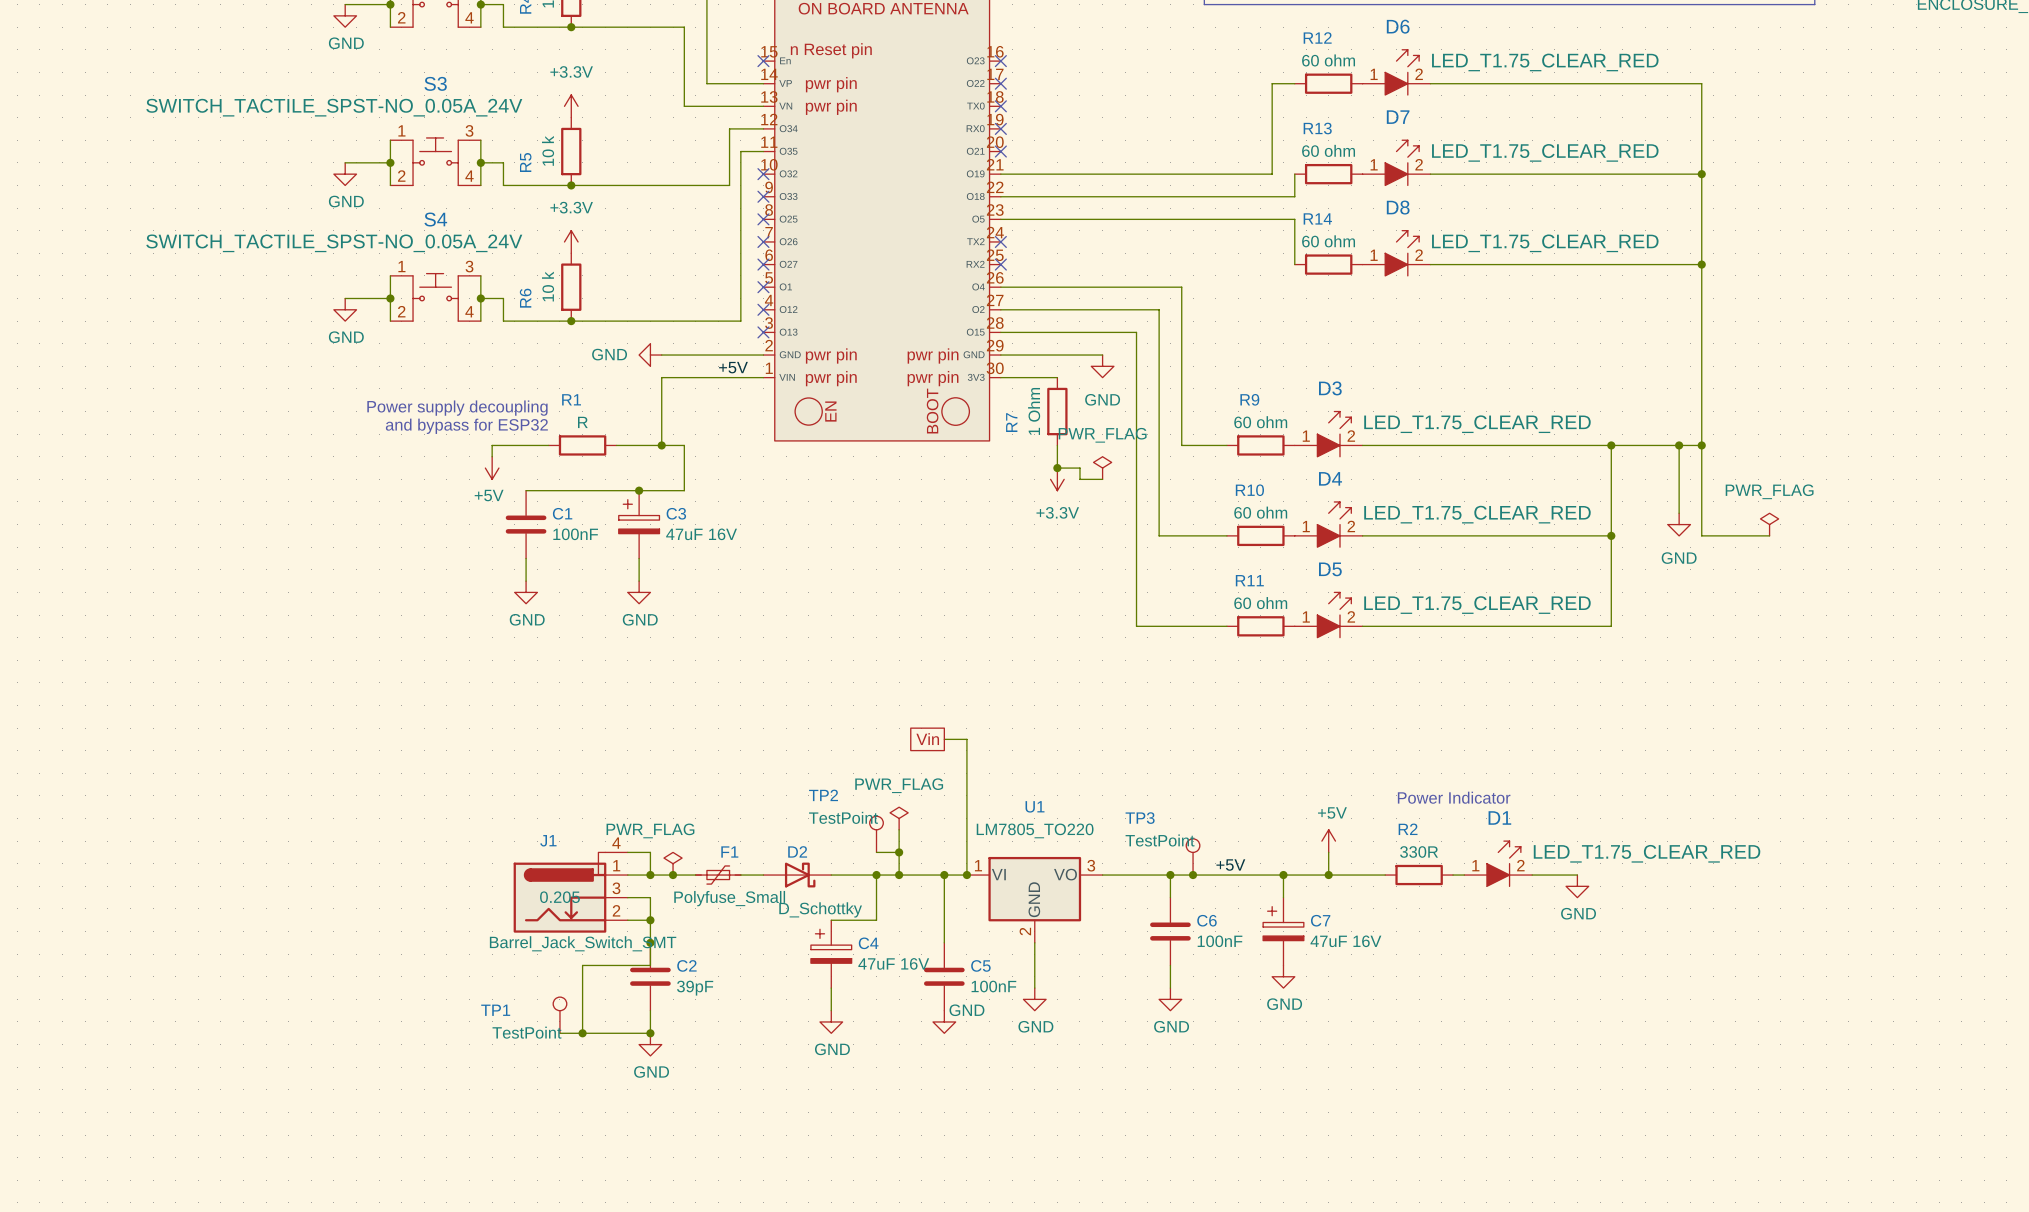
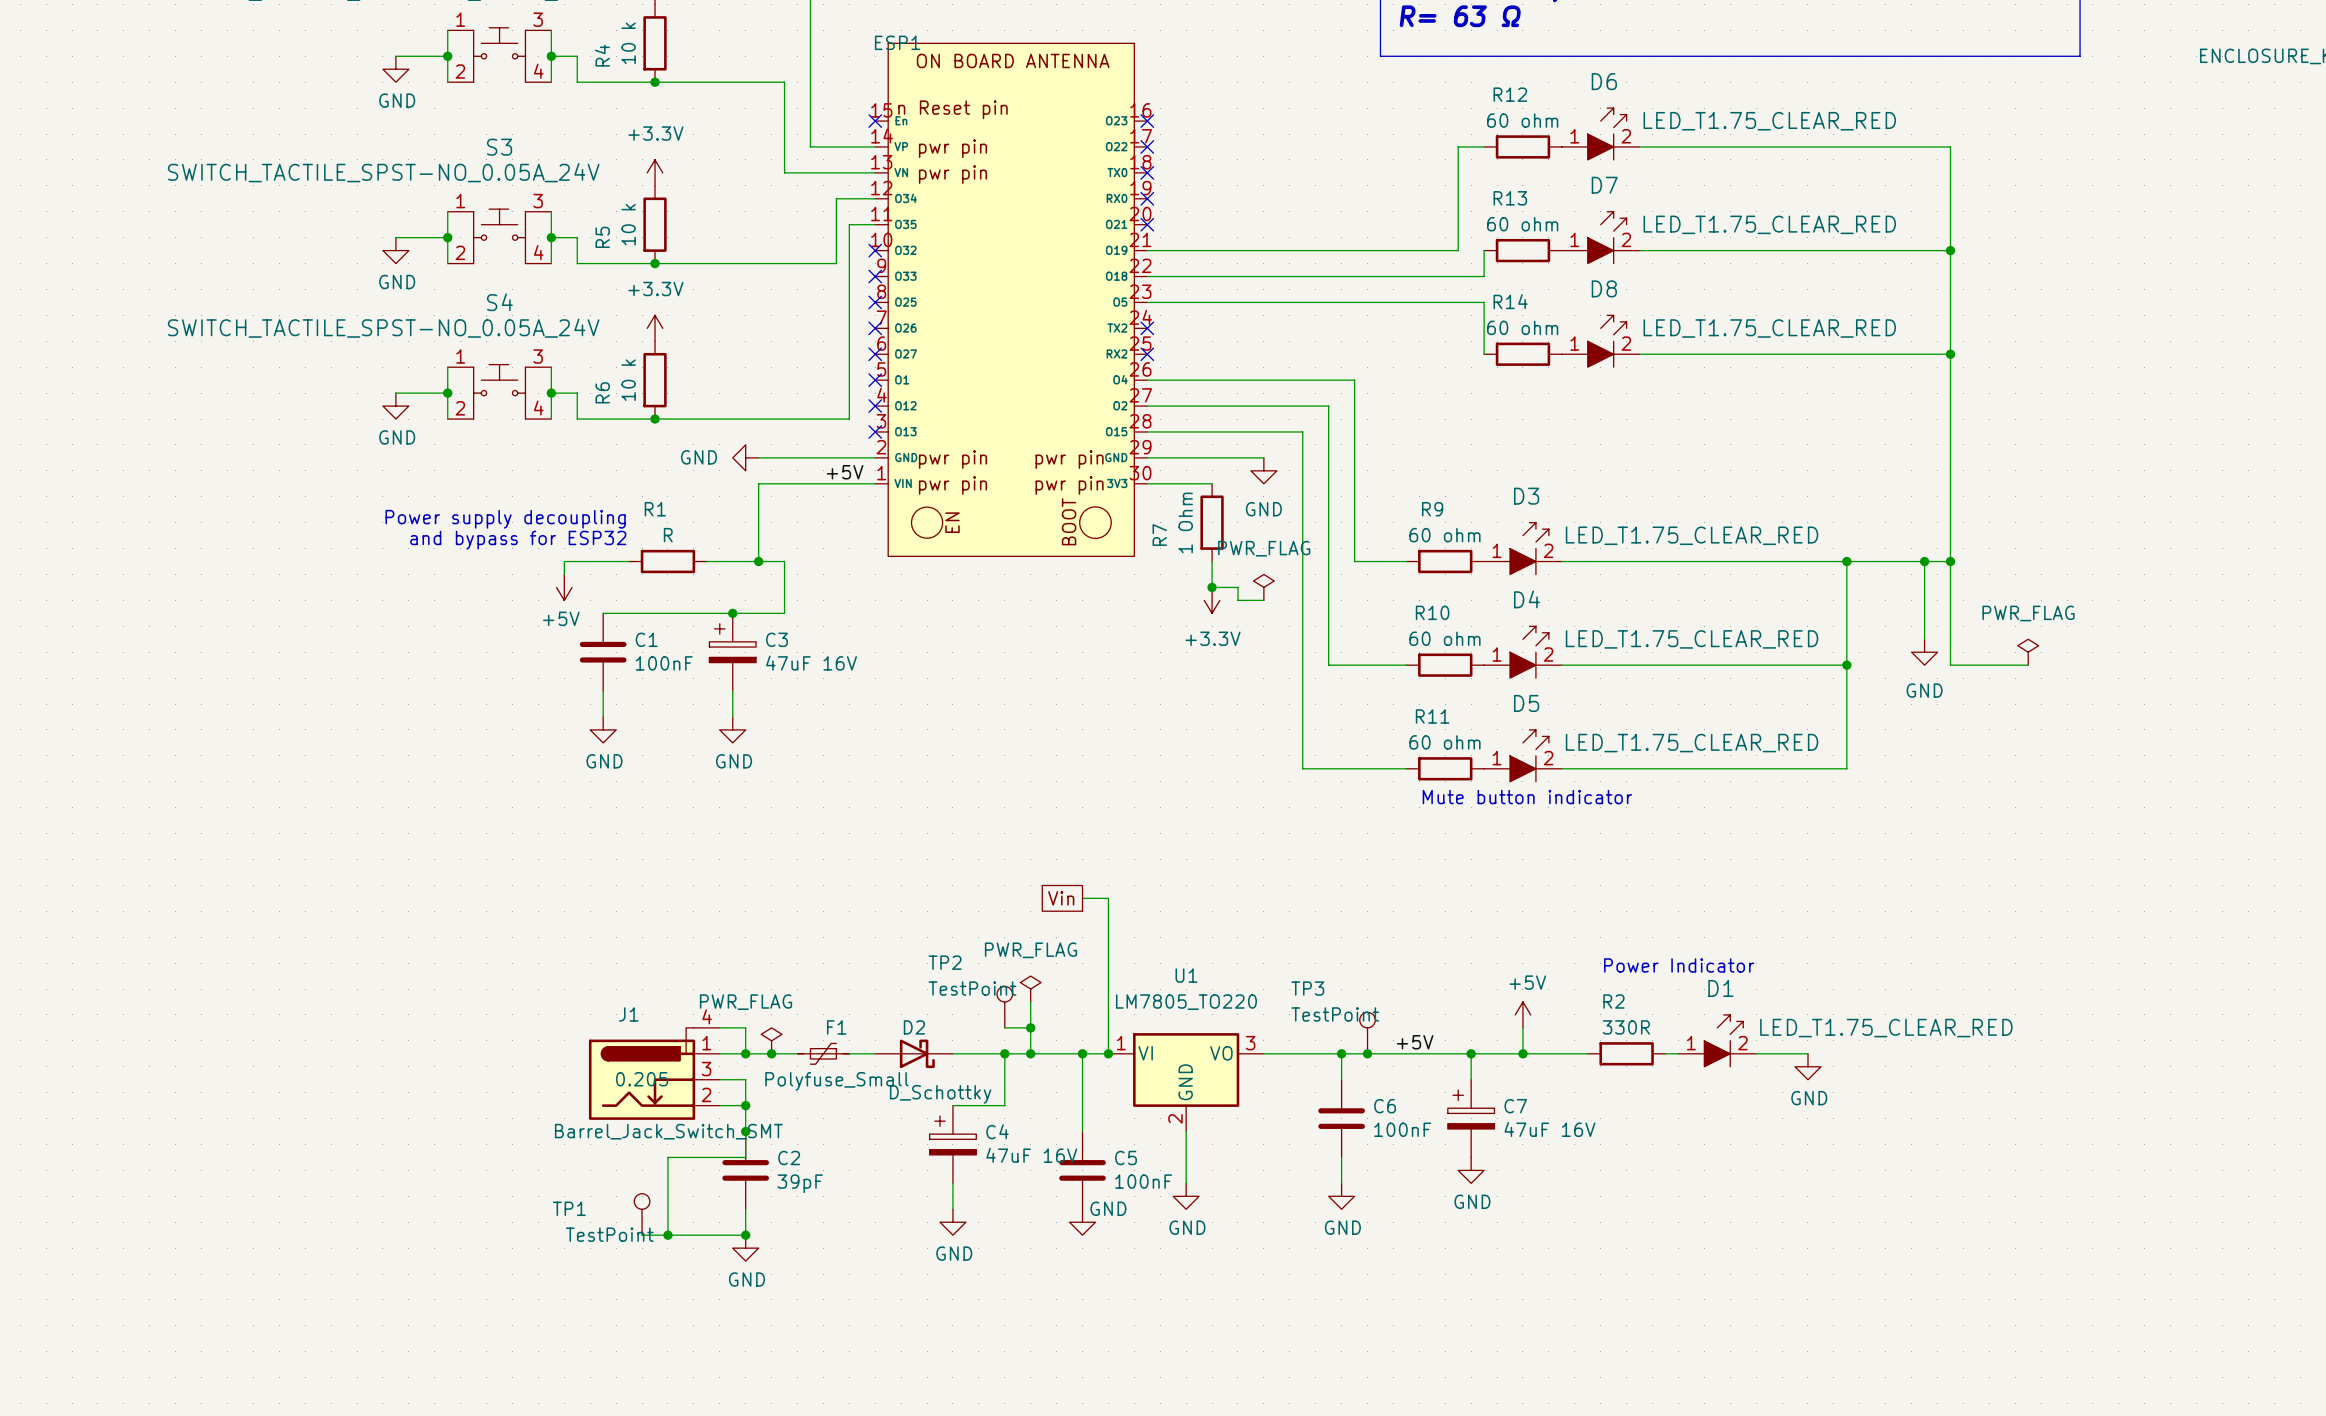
text: none -> Mute button indicator (1527, 797)

